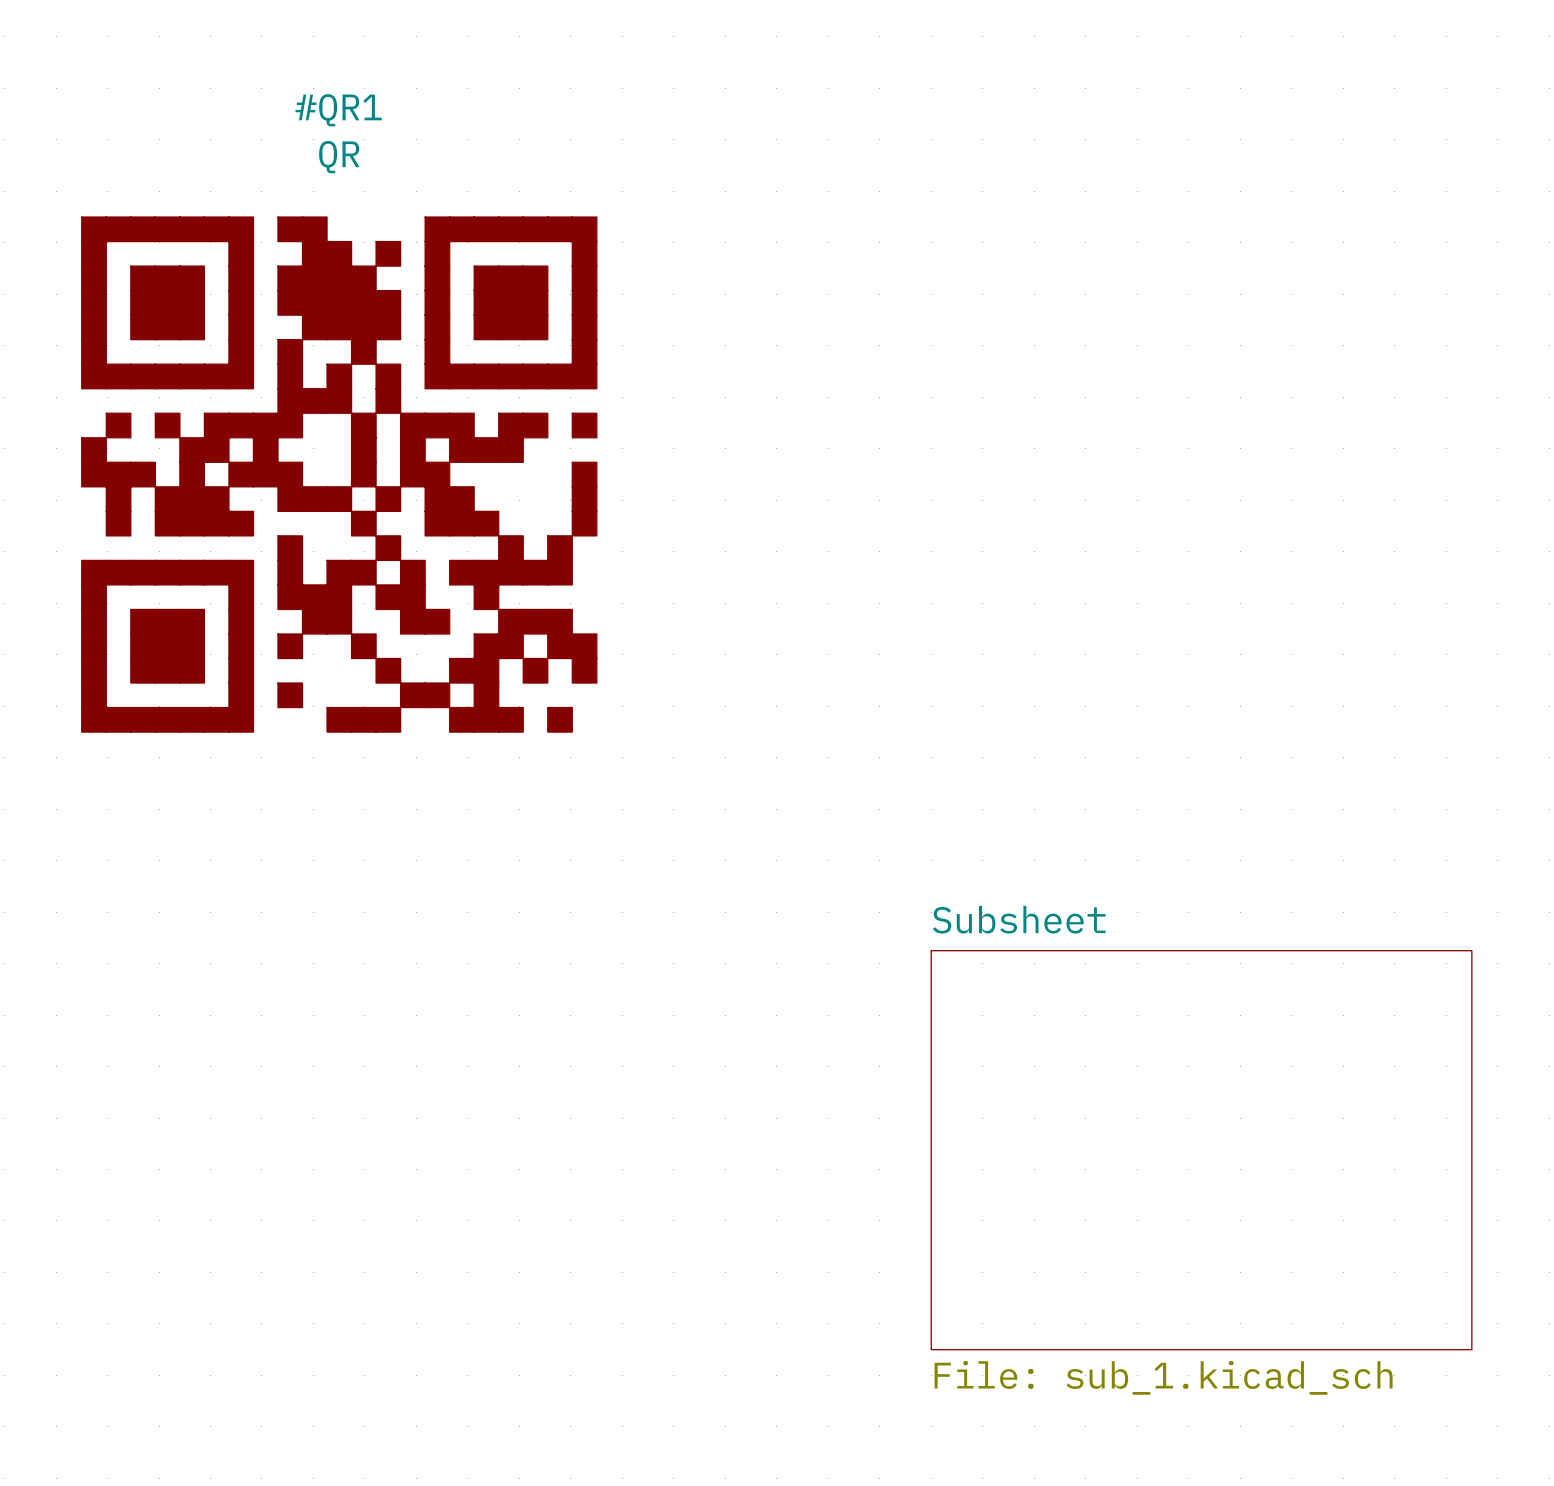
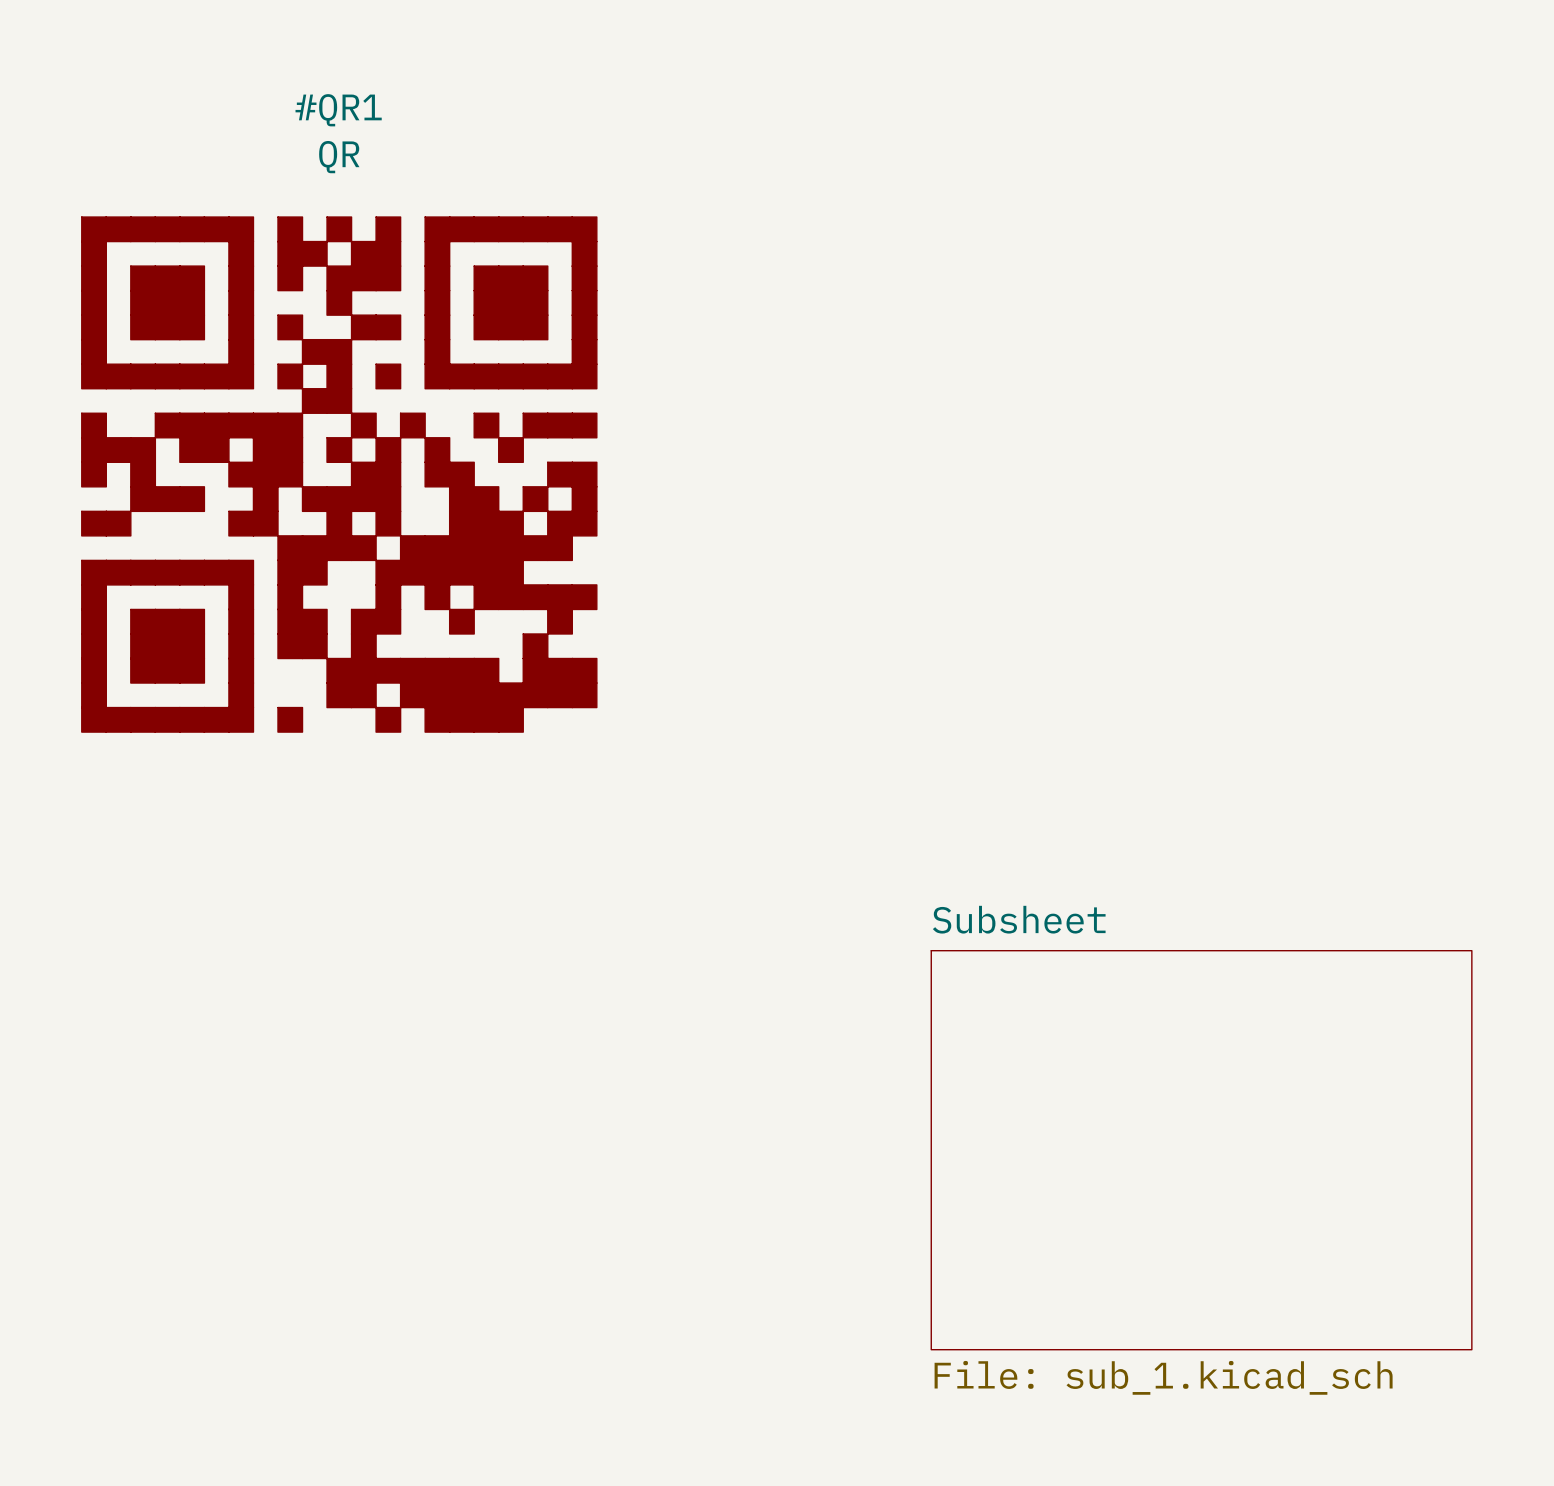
#QR1 shape: [81, 217, 597, 733] -> [81, 217, 597, 733]

